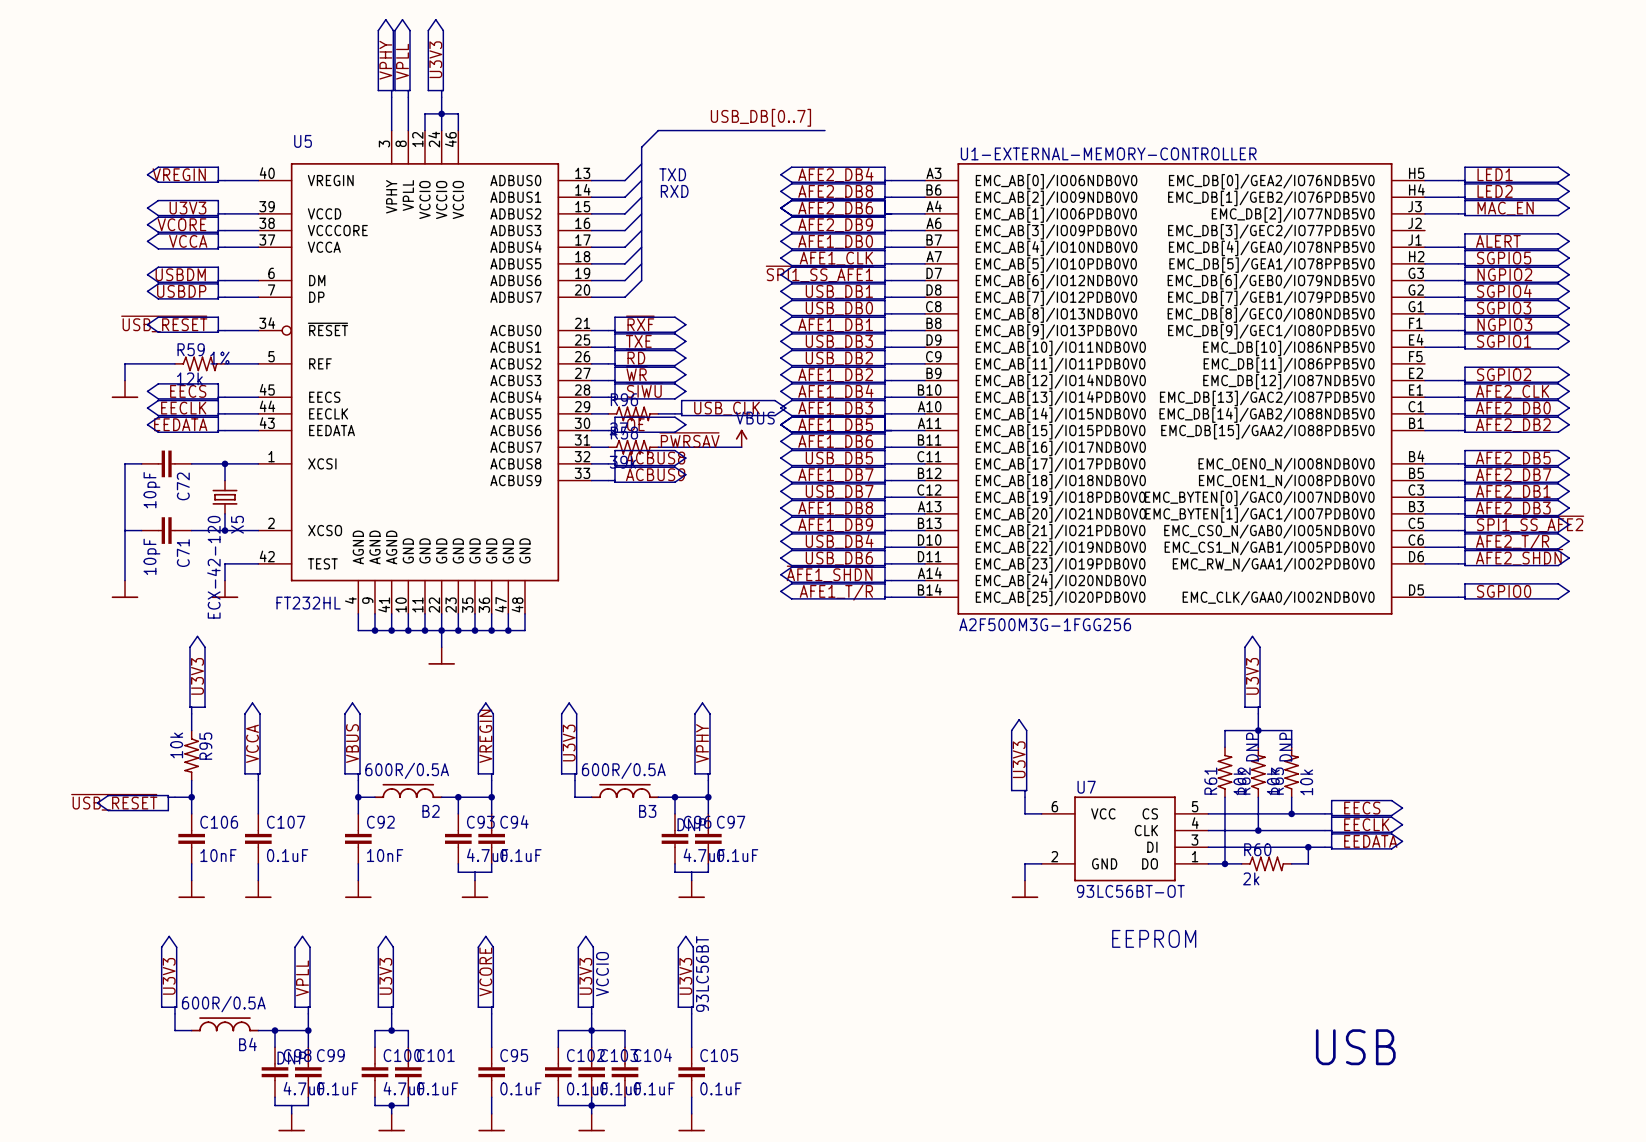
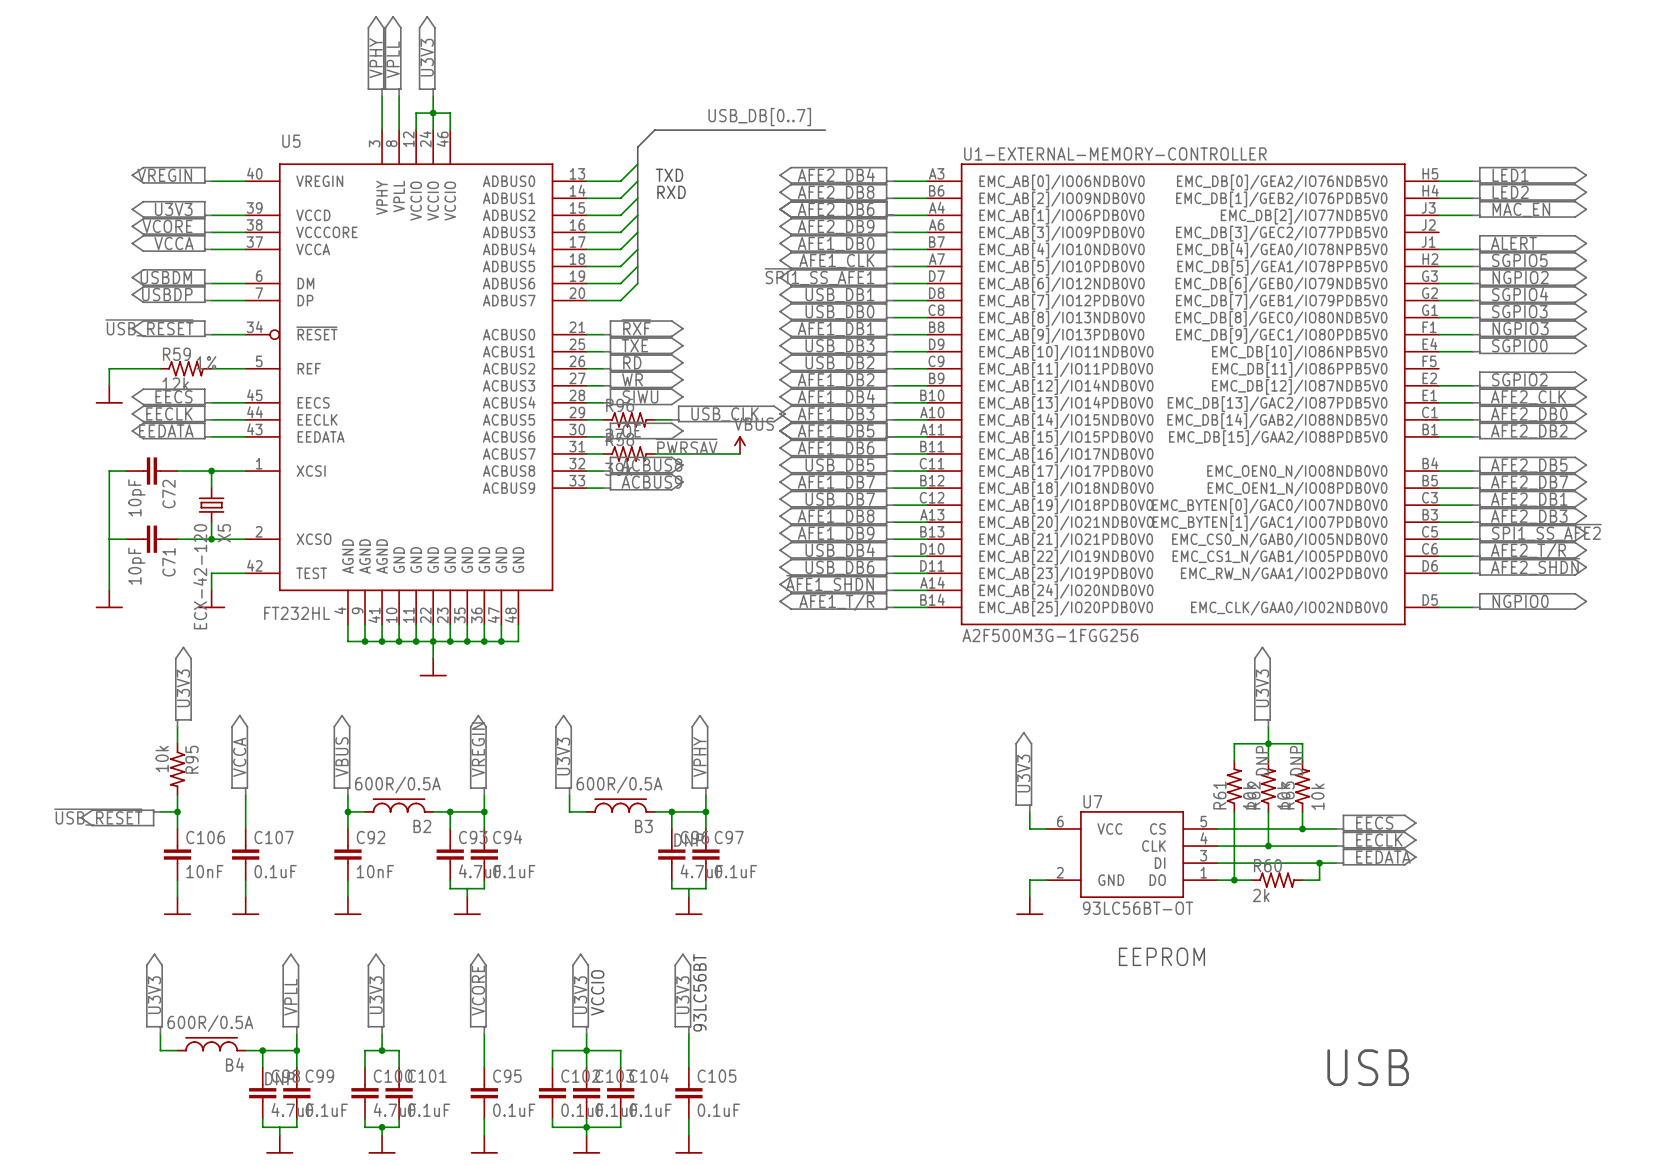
label: SGPIO1 (1504, 341) -> SGPIO0 (1519, 345)
label: SGPIO0 (1504, 591) -> NGPIO0 (1520, 601)

